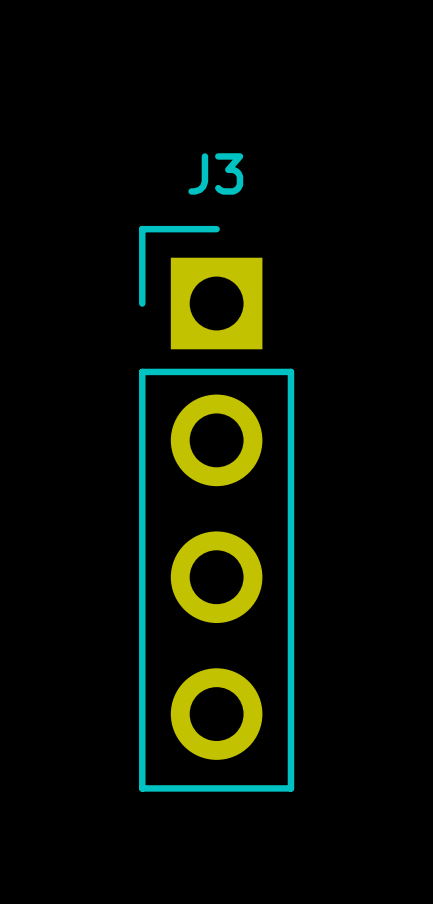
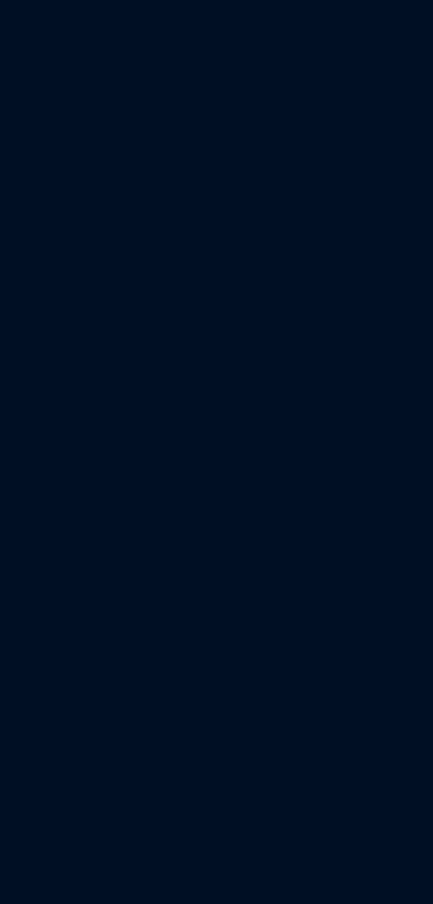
J3: (216, 508) -> none

